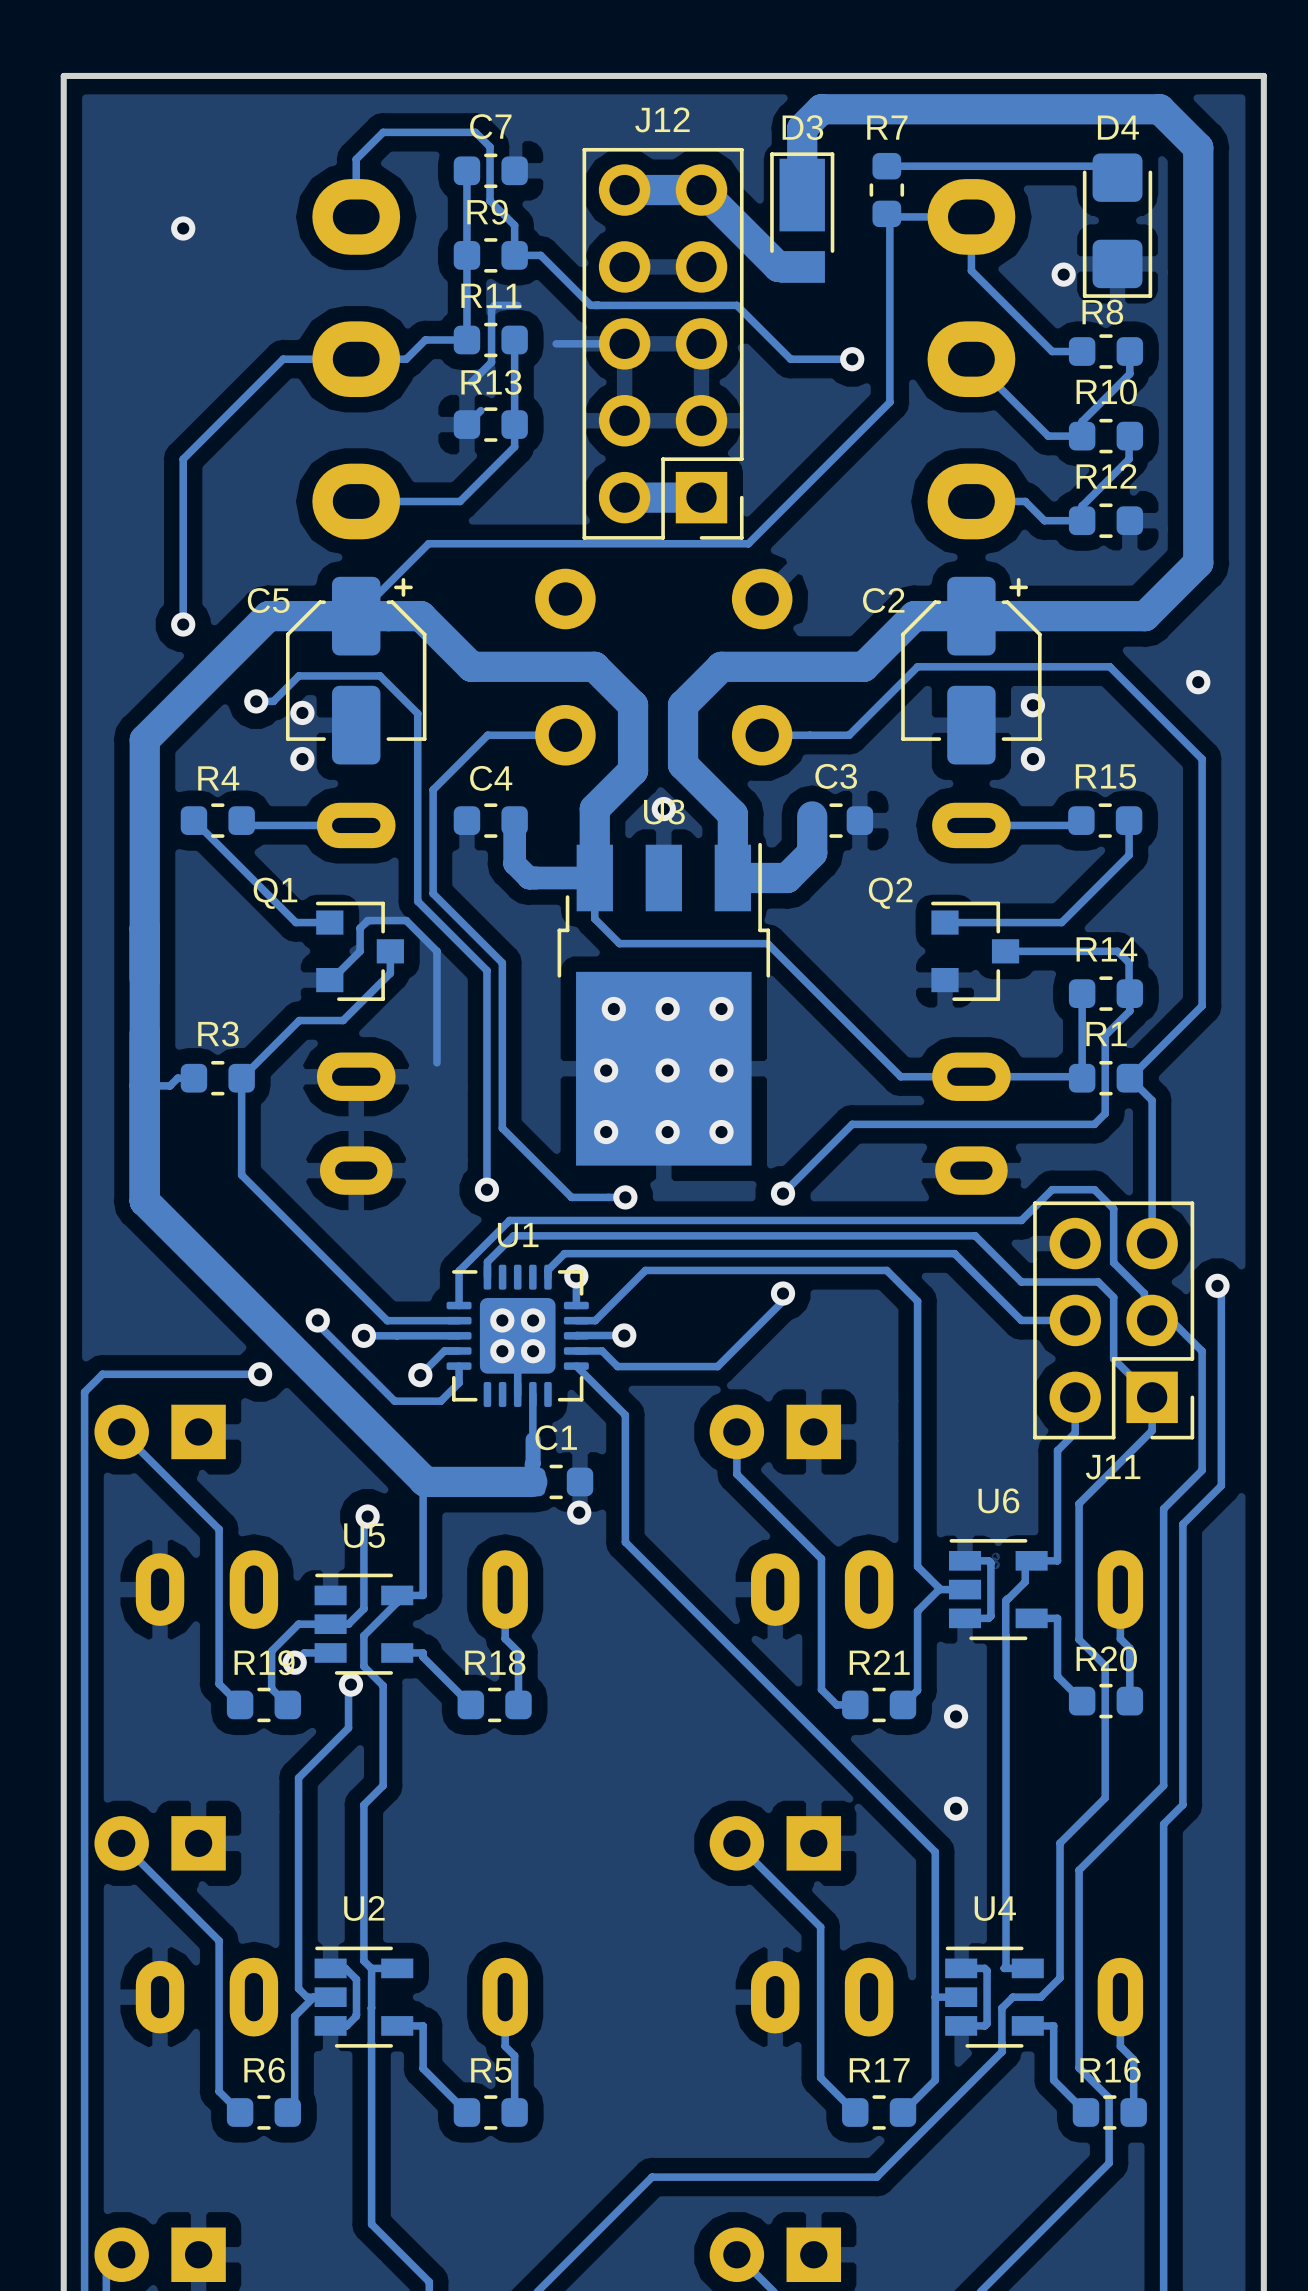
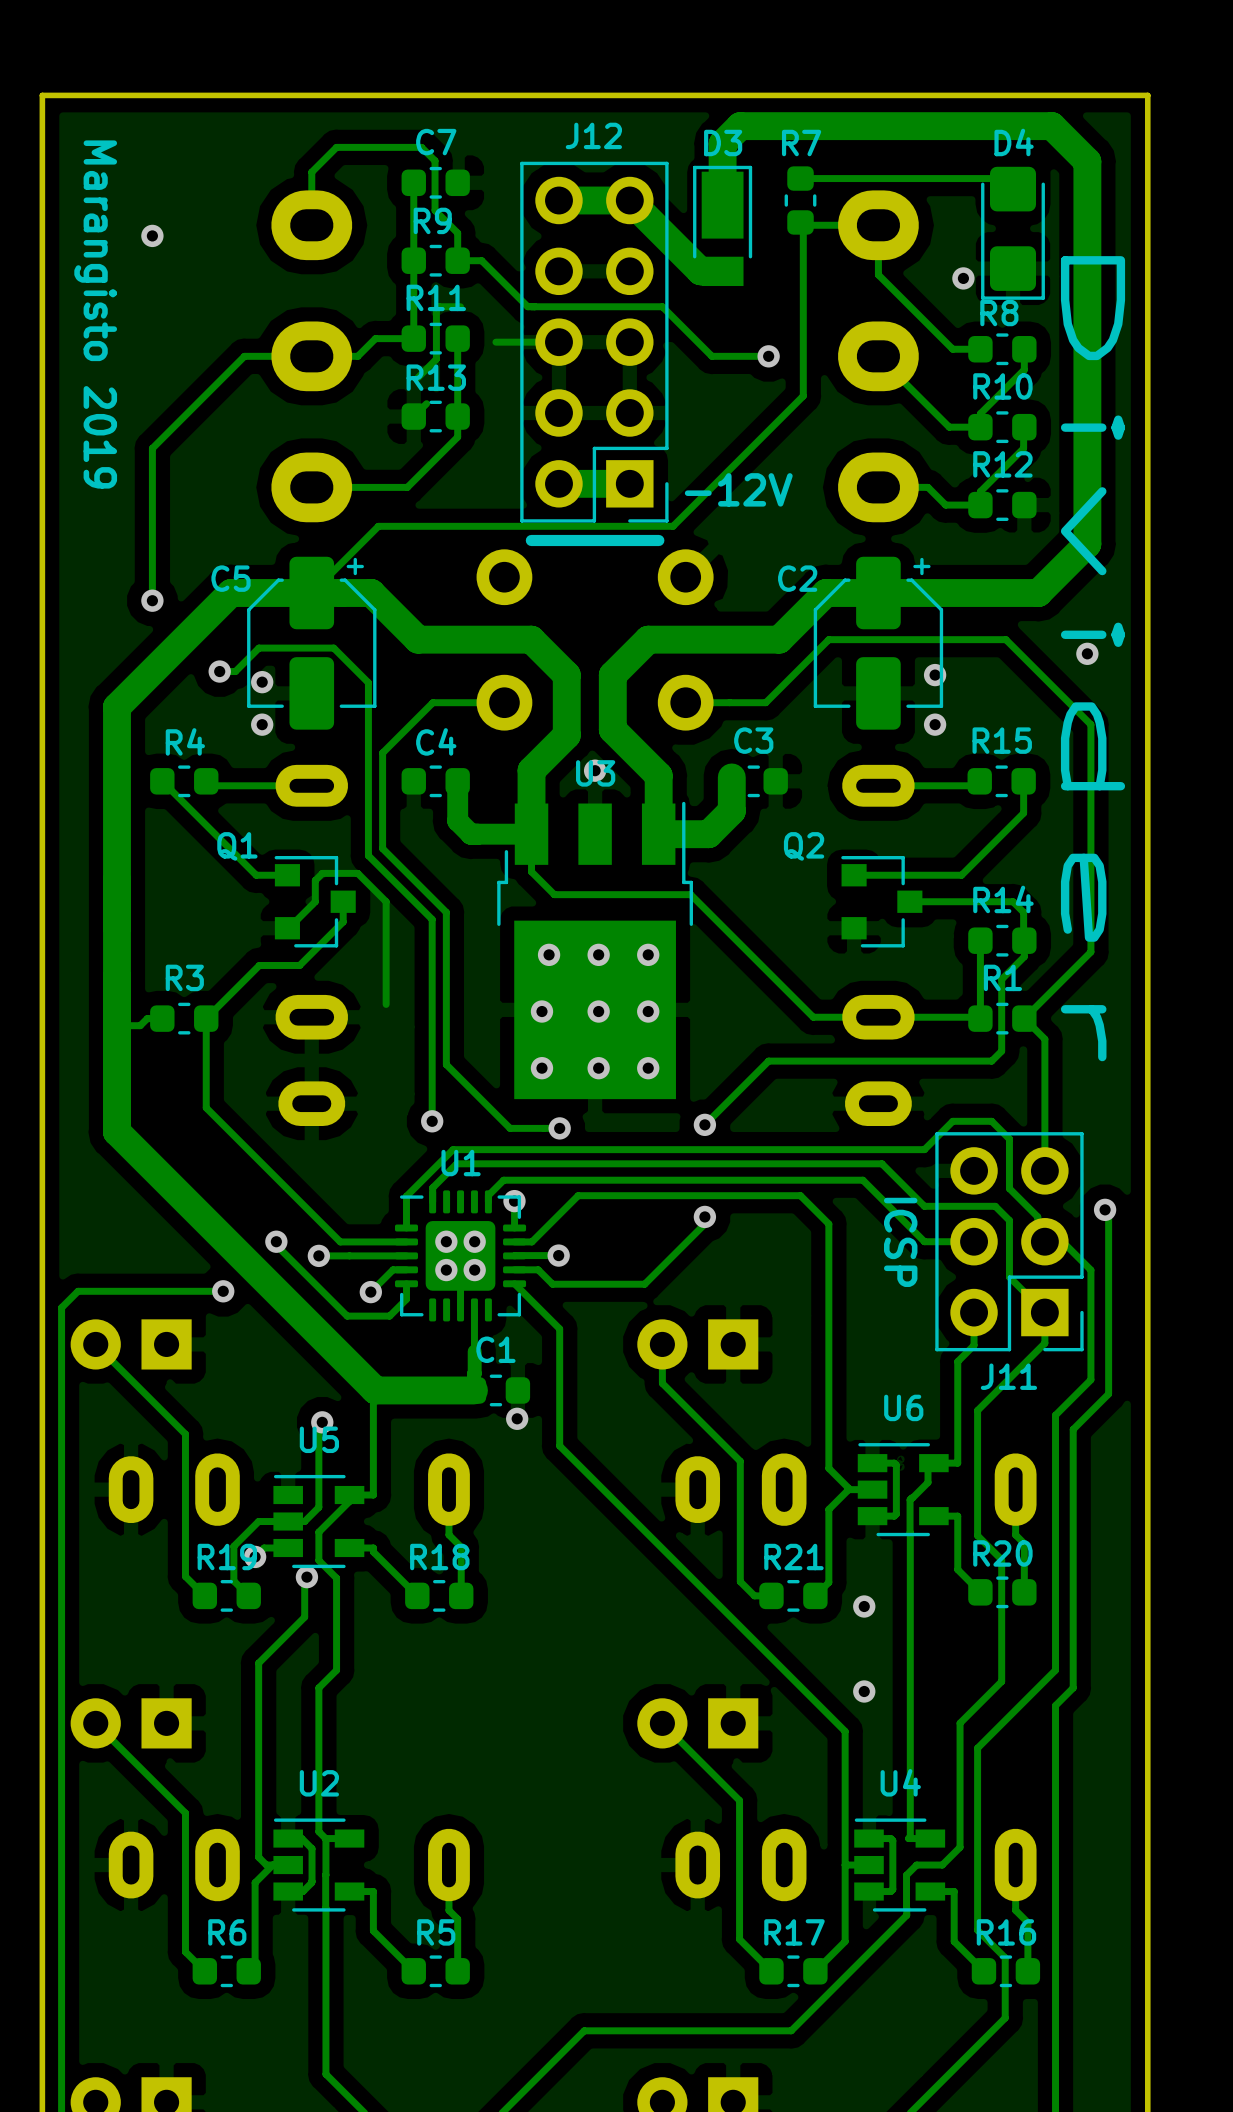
text: none -> Marangisto 2019 (95, 314)
text: none -> -12V (738, 489)
line: none -> (658, 540) (531, 540)
text: none -> Divider (1093, 658)
text: none -> ICSP (900, 1242)

